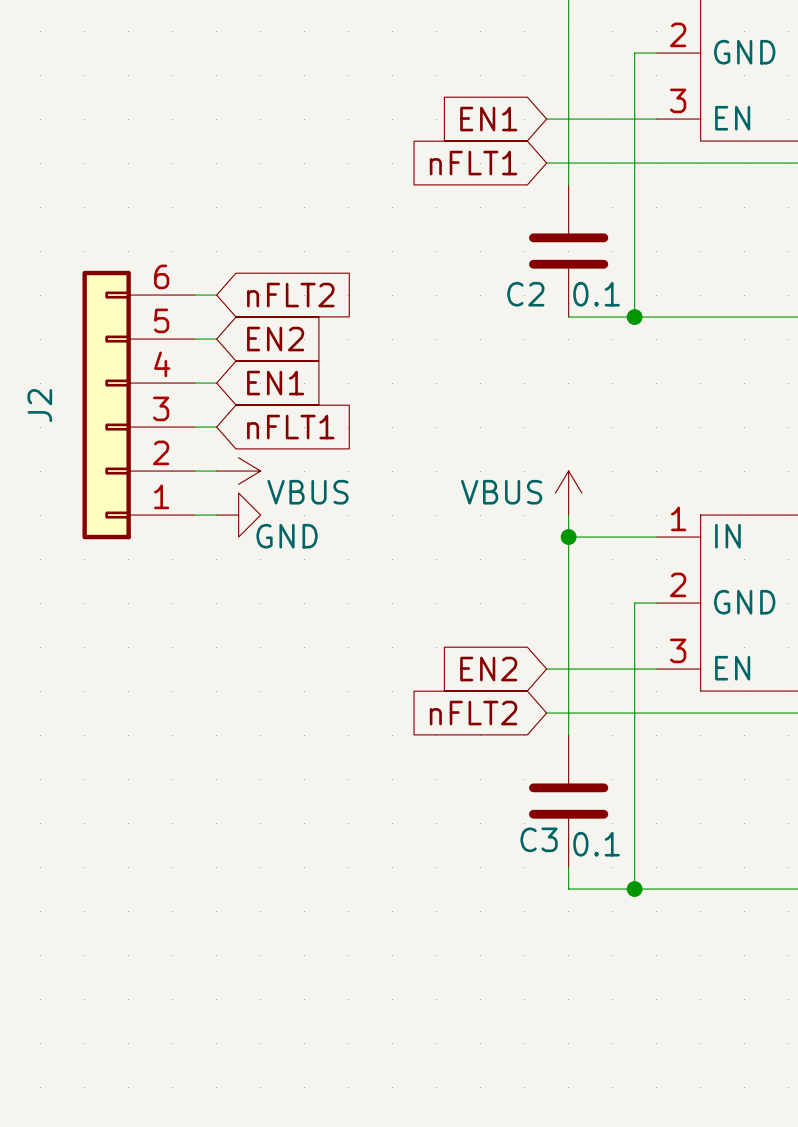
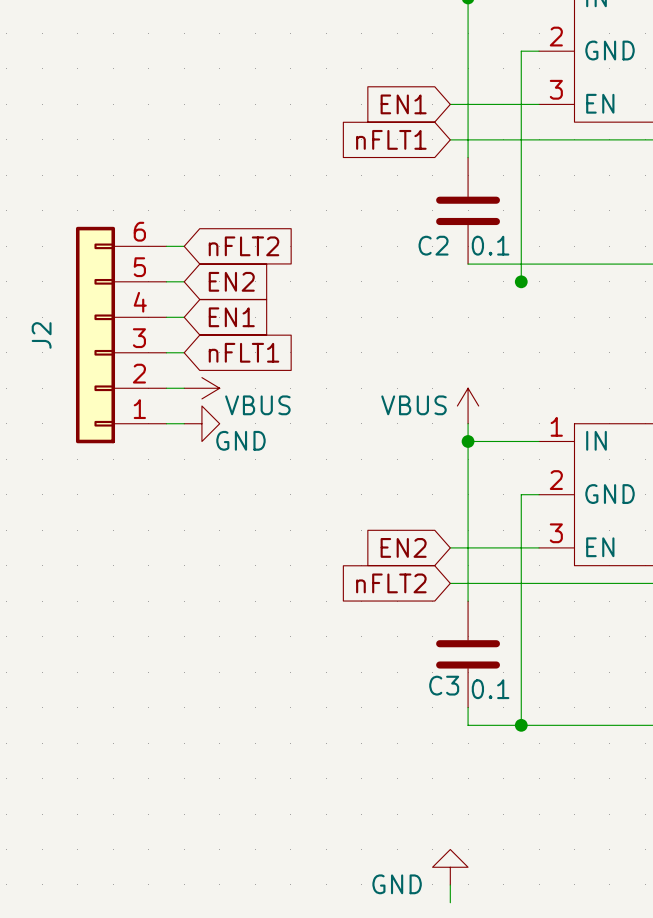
wire: none -> (521, 264) (521, 281)
junction position: (634, 317) -> (521, 281)
power symbol: none -> GND (450, 867)
wire: none -> (450, 884) (450, 902)

